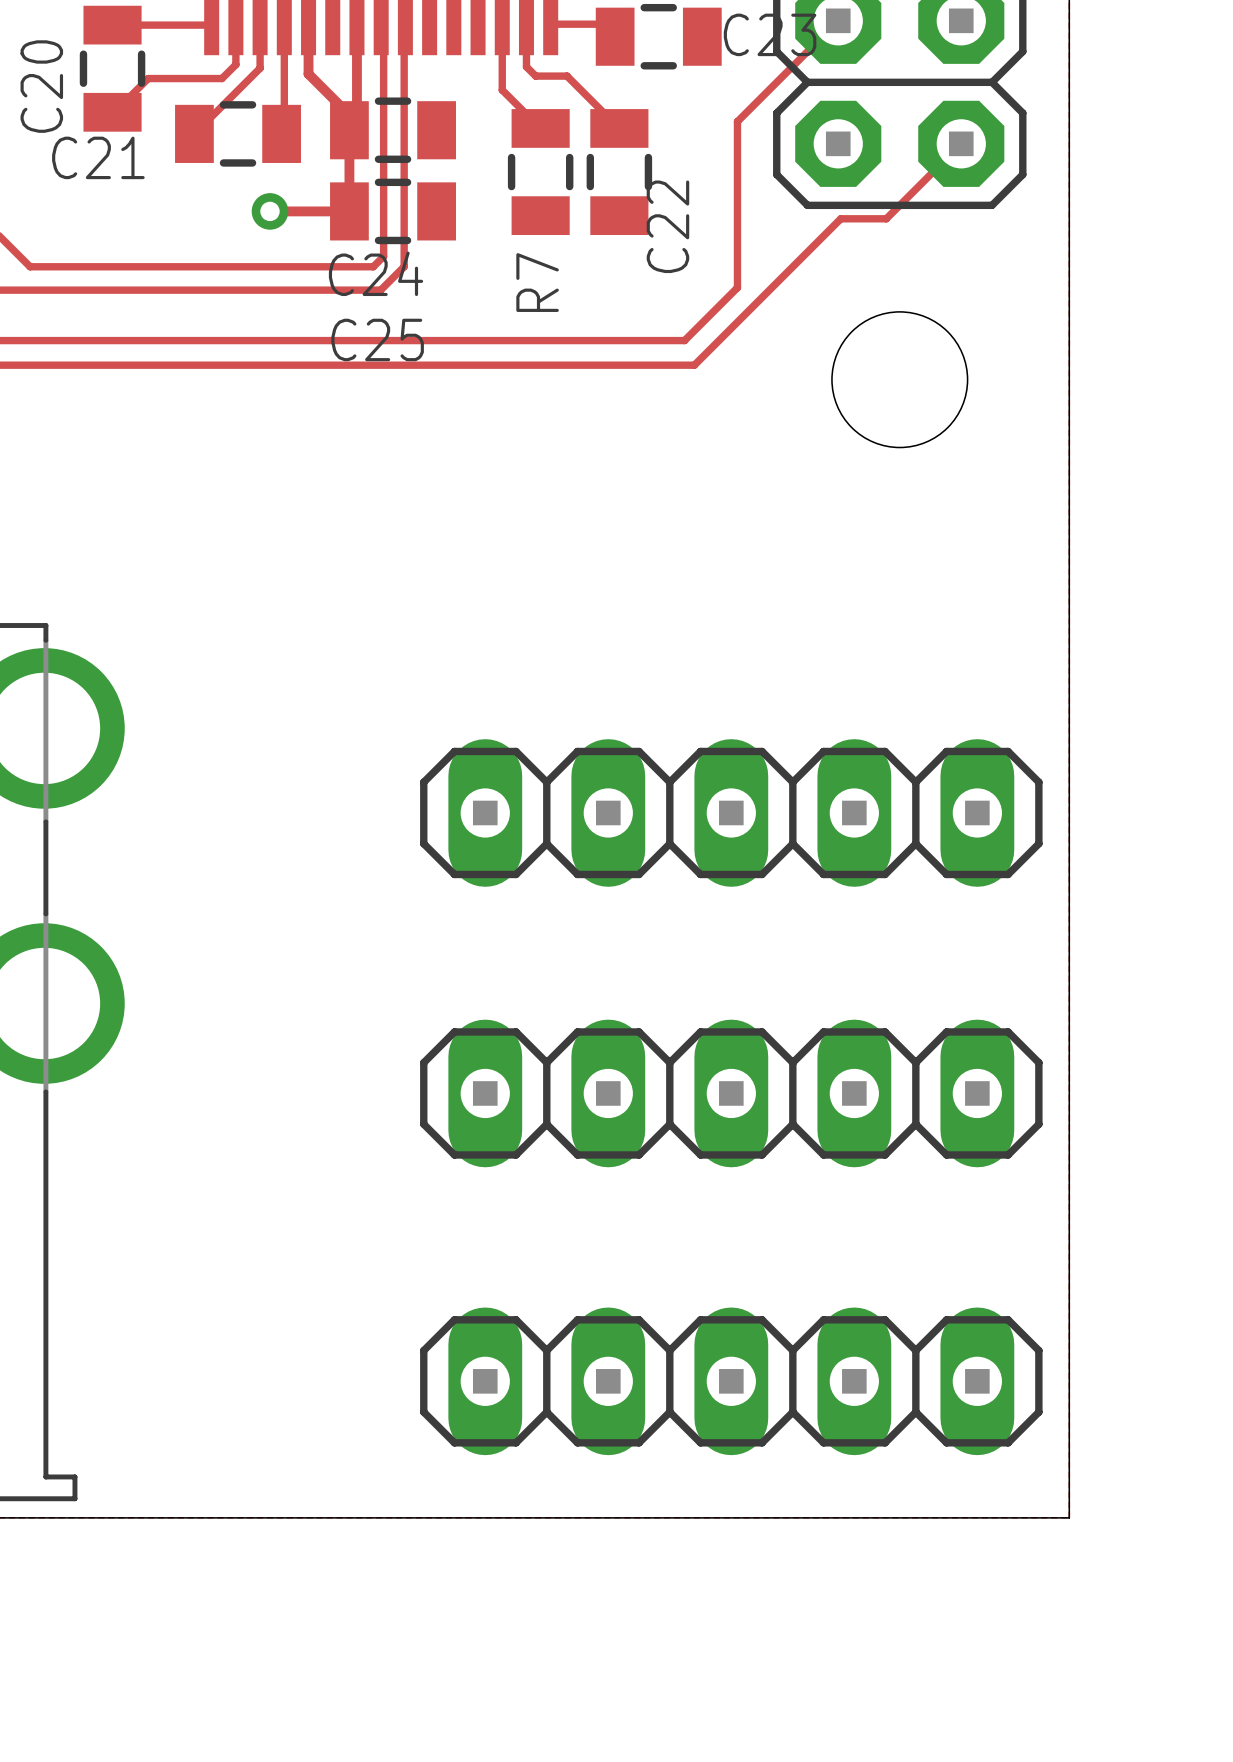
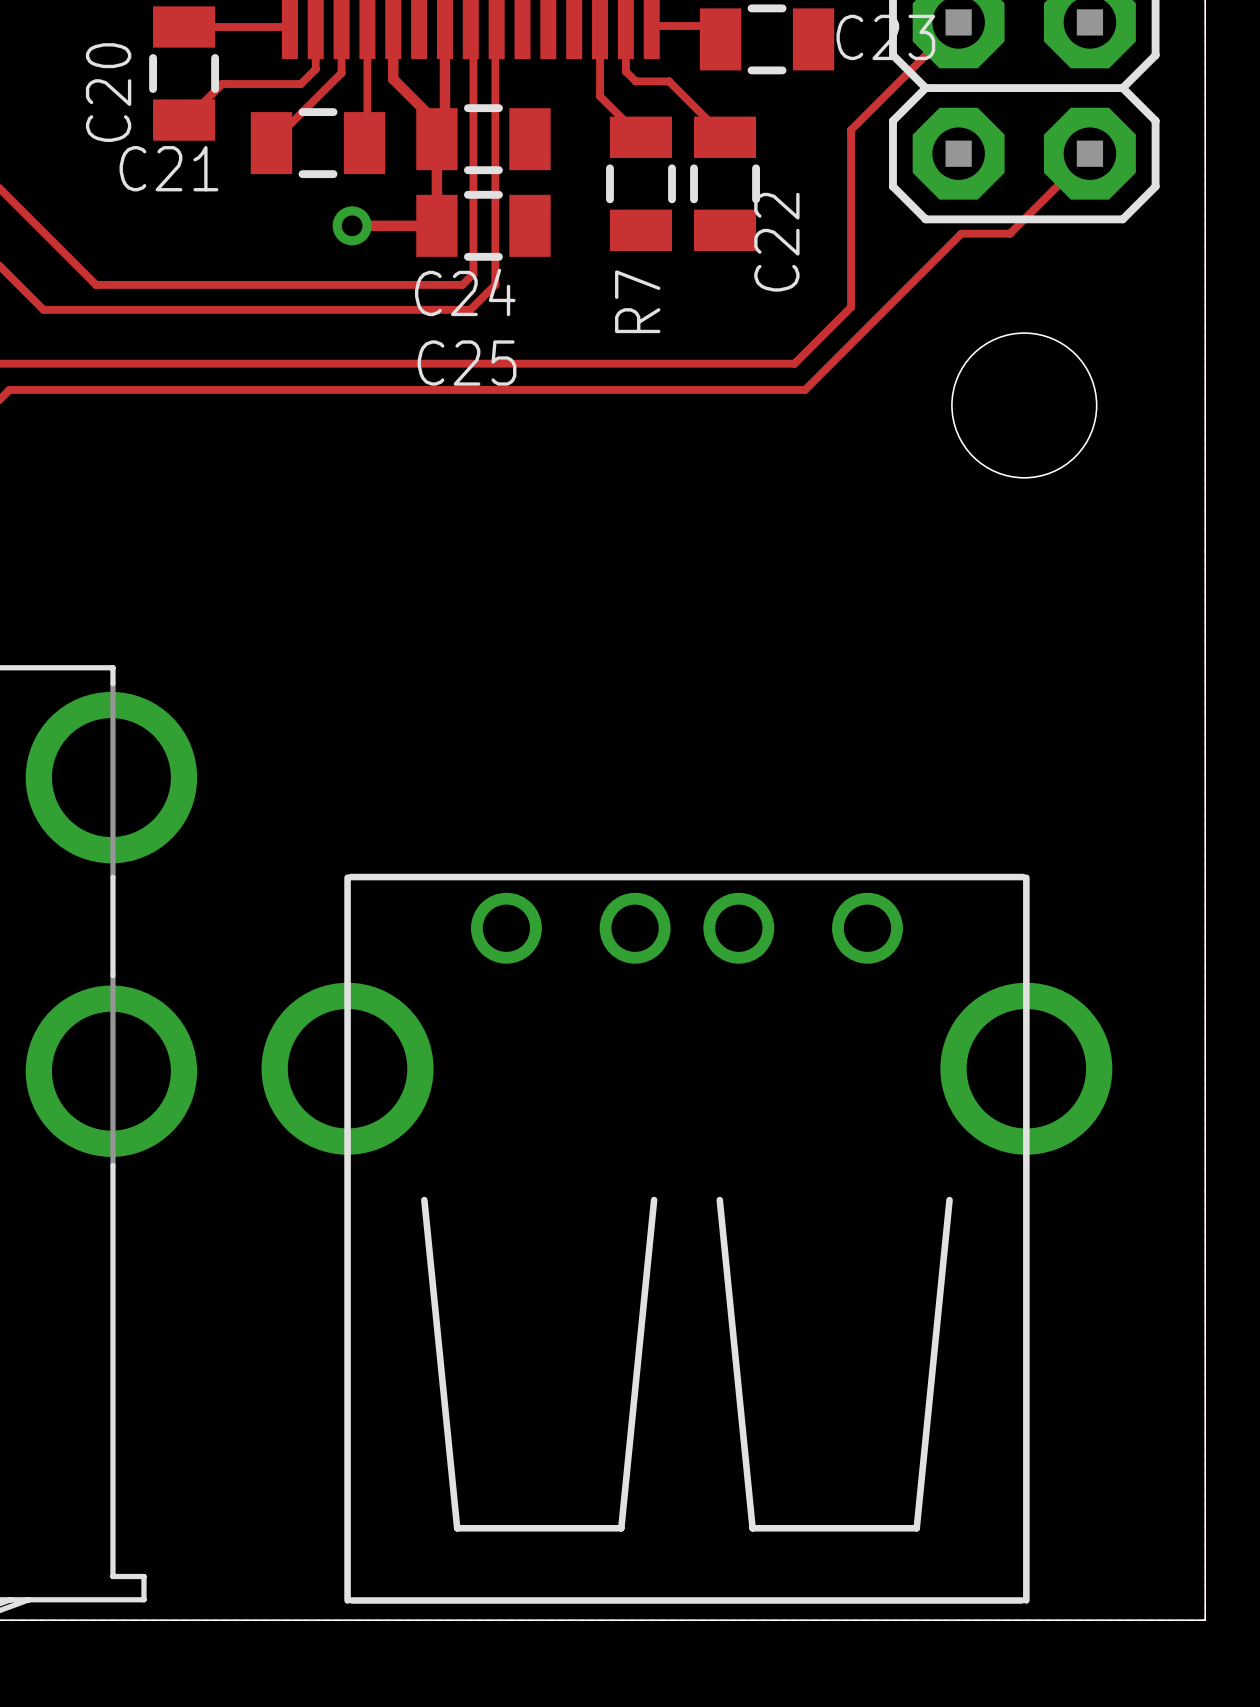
part: (731, 812) -> none
part: (731, 1093) -> none
part: none -> (686, 1238)
part: (731, 1381) -> none

